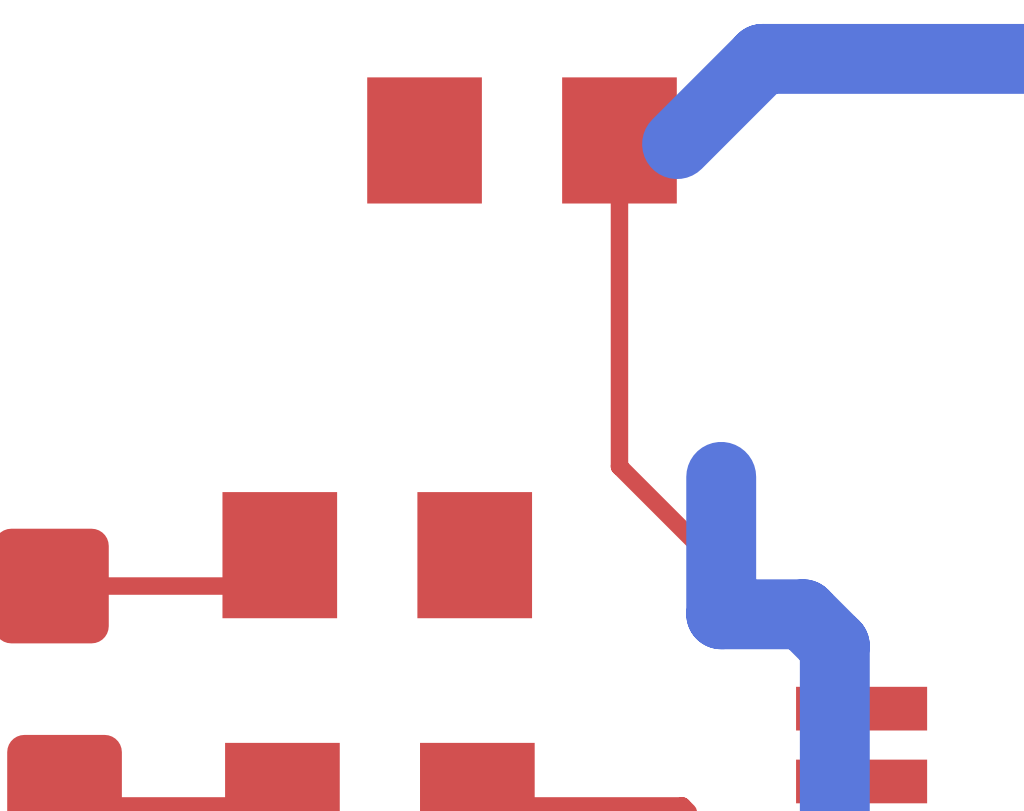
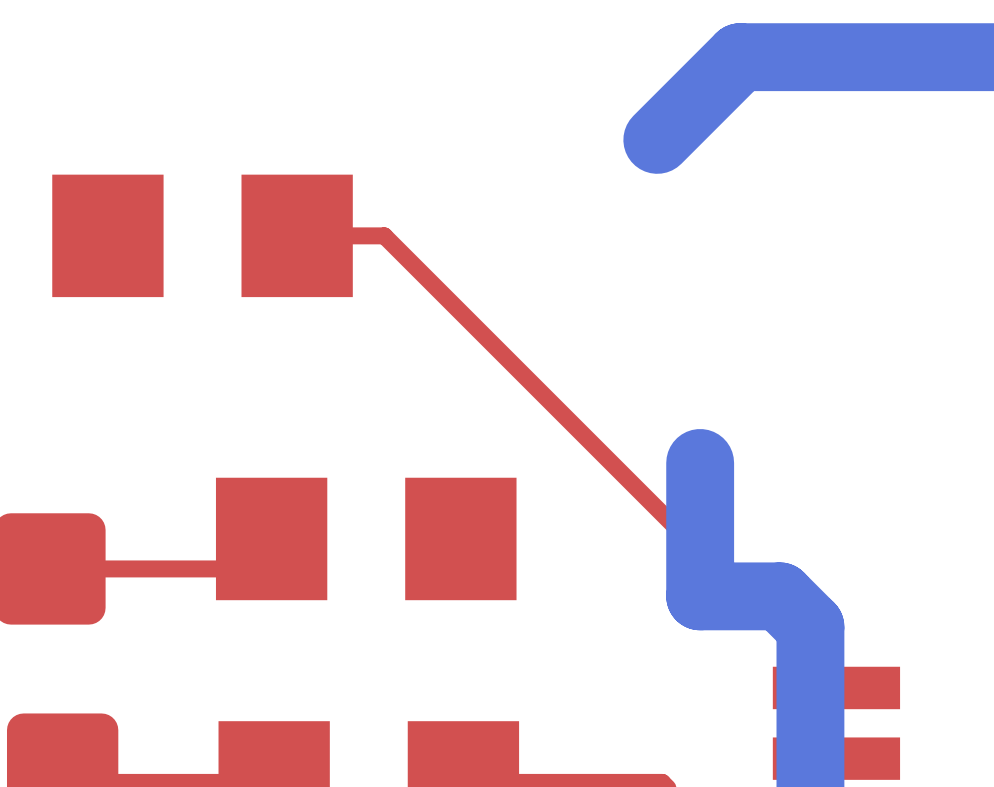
part position: (522, 140) -> (202, 235)
top track: (619, 140) (619, 466) -> (297, 235) (384, 235) (601, 452)

